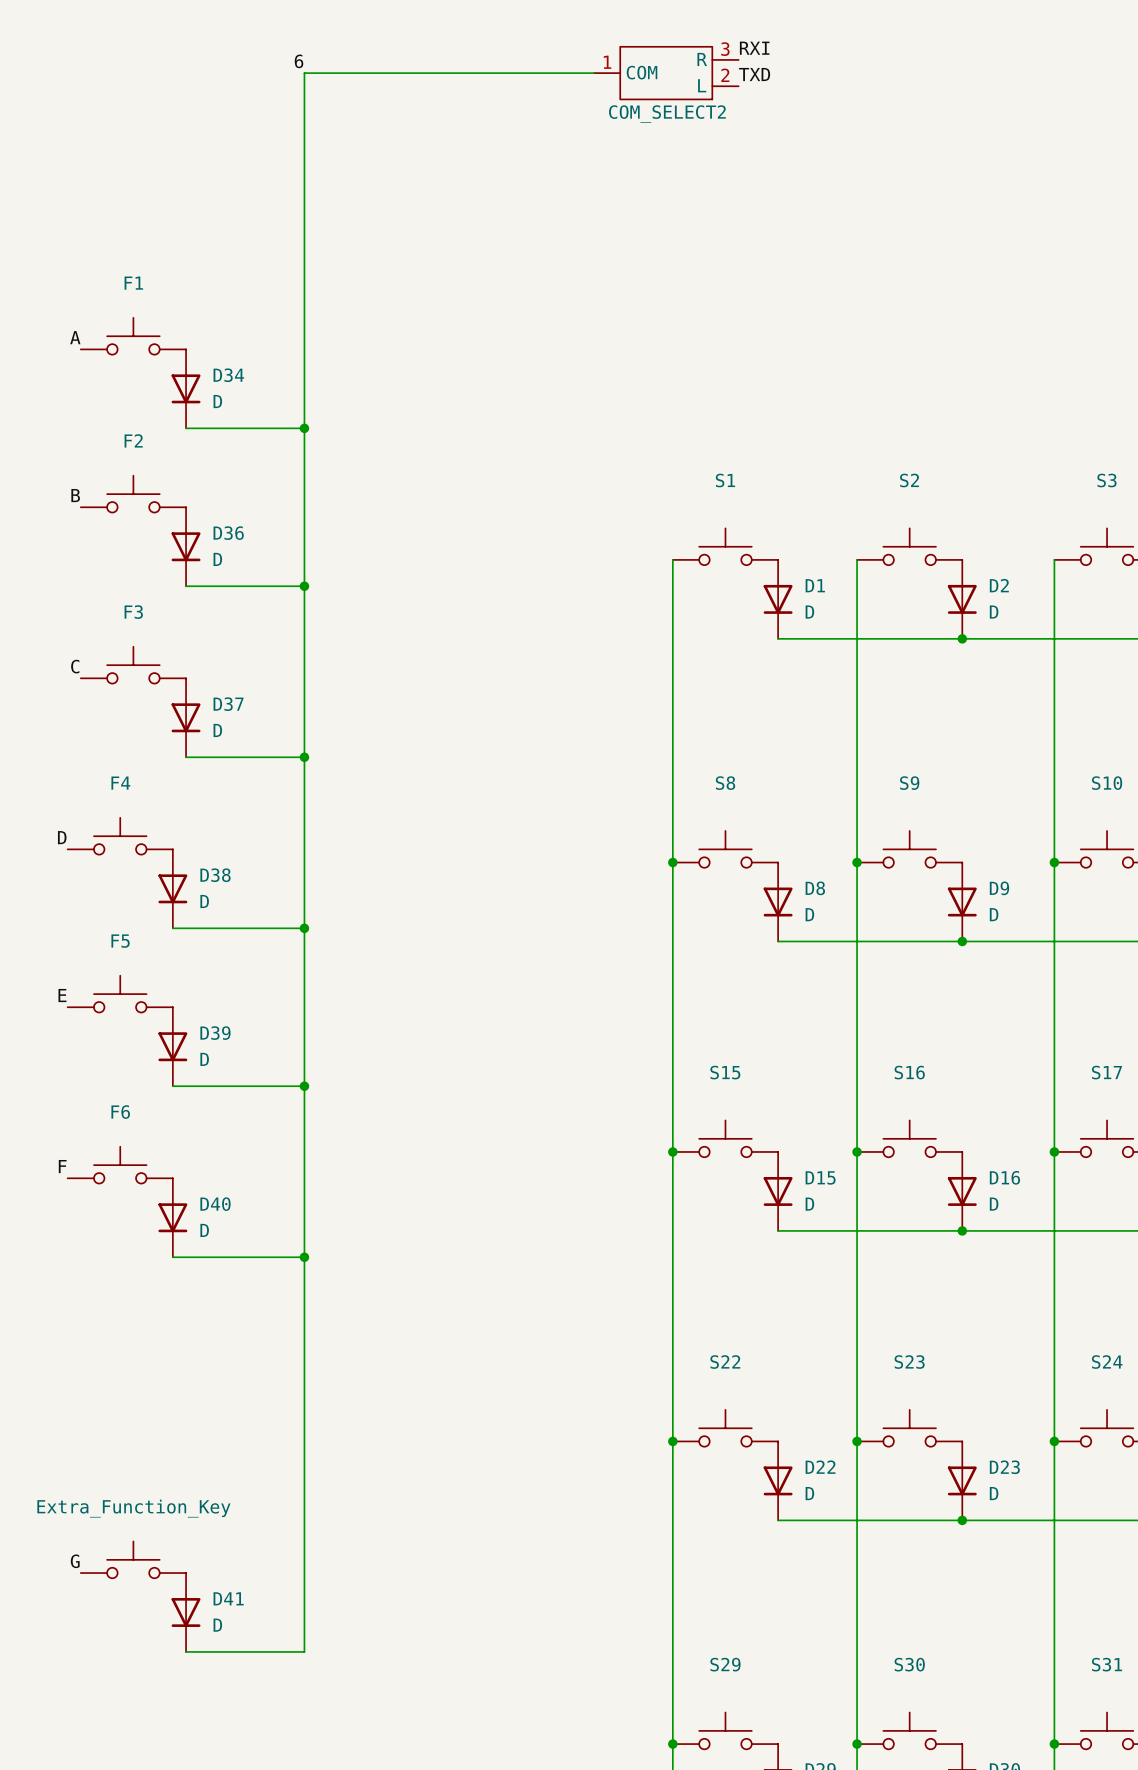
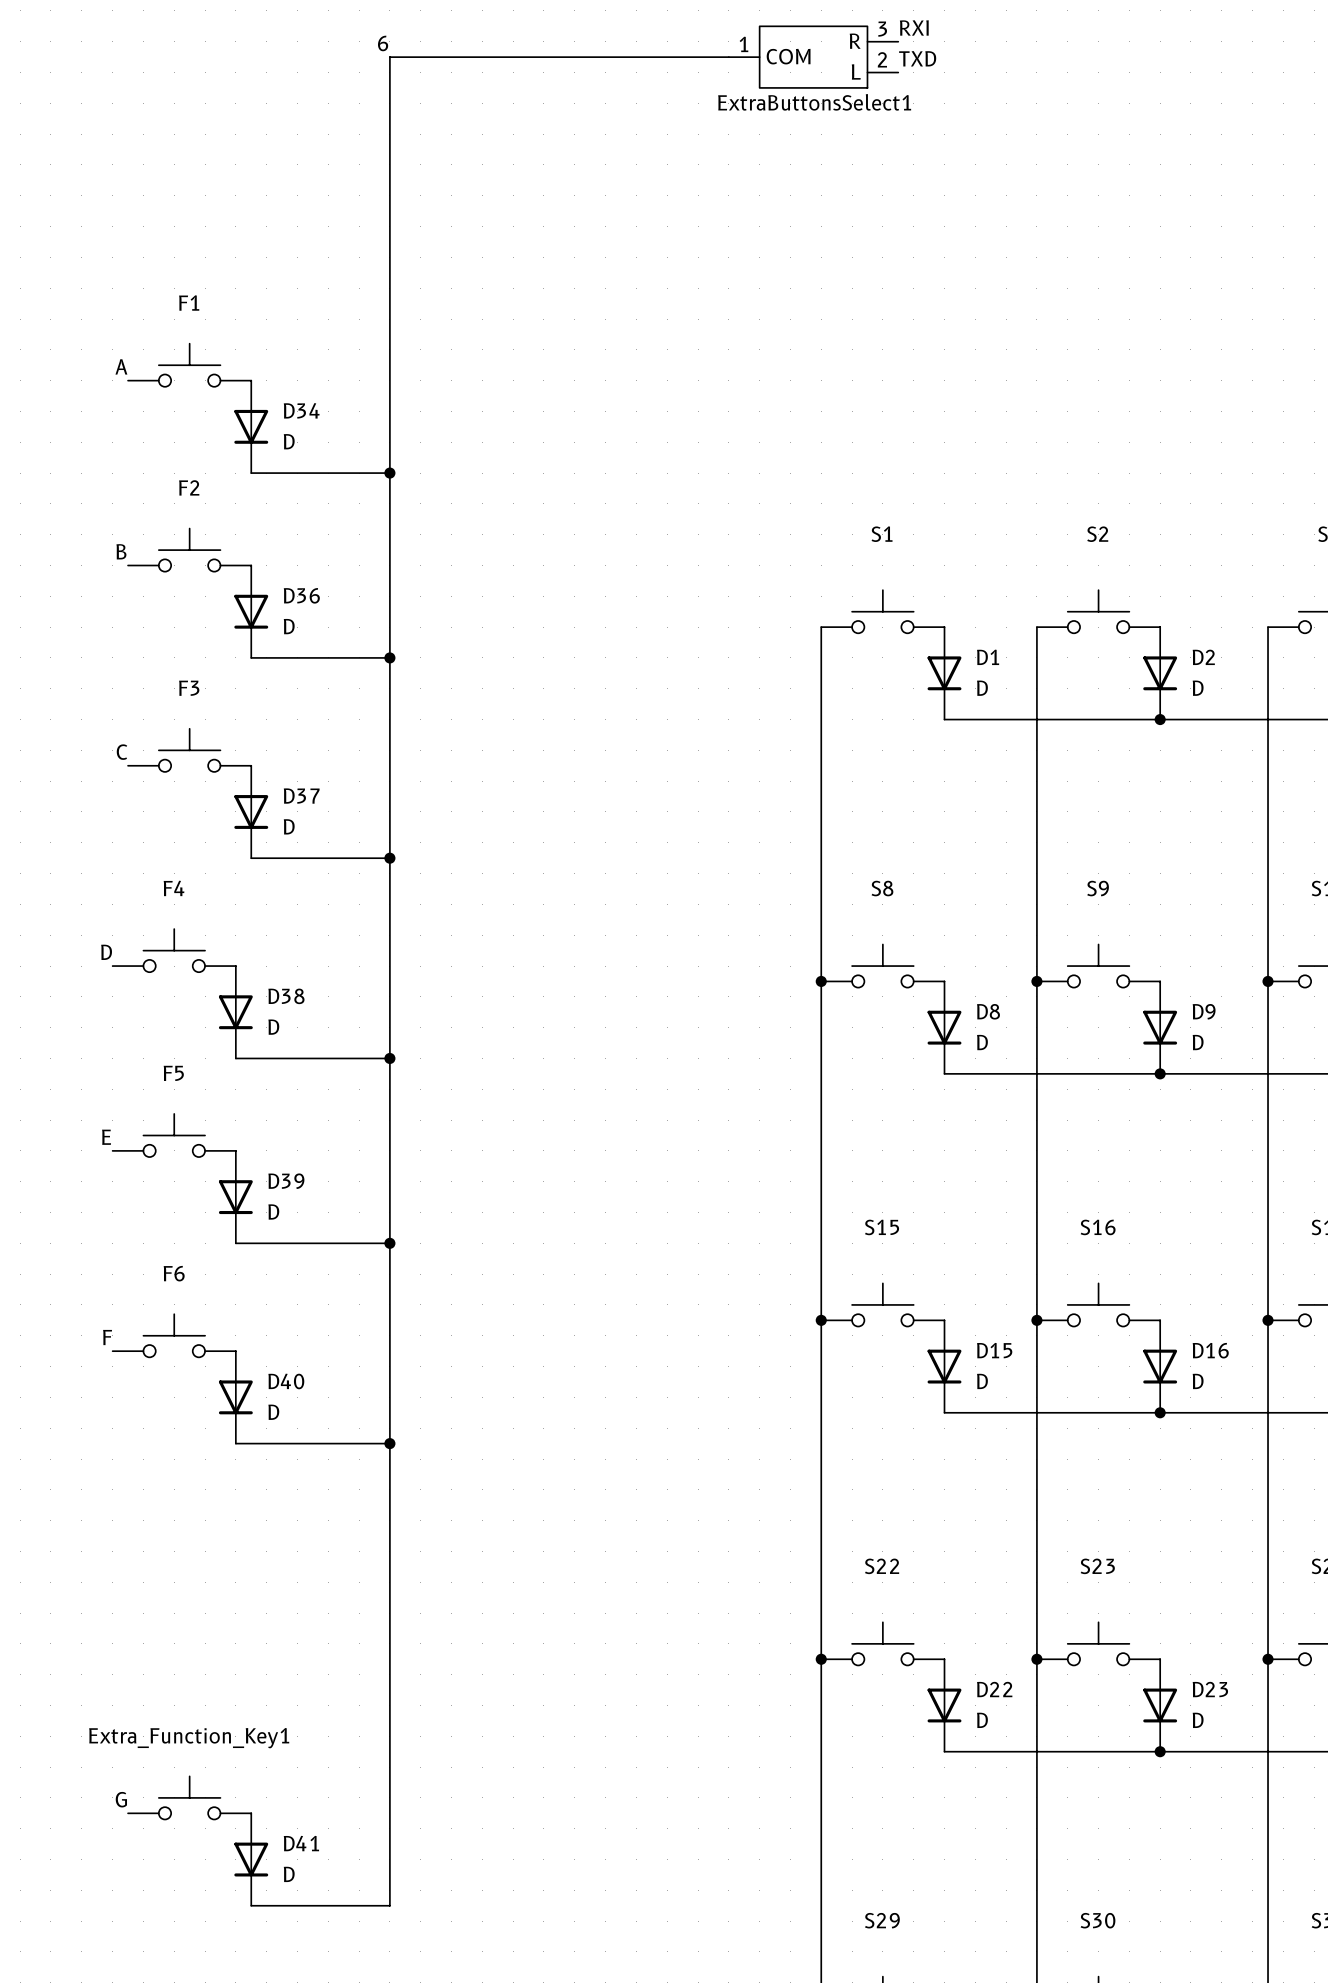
COM_SELECT2 name: COM_SELECT2 (667, 114) -> ExtraButtonsSelect1 (814, 102)
Extra_Function_Key name: Extra_Function_Key (133, 1508) -> Extra_Function_Key1 (189, 1738)

